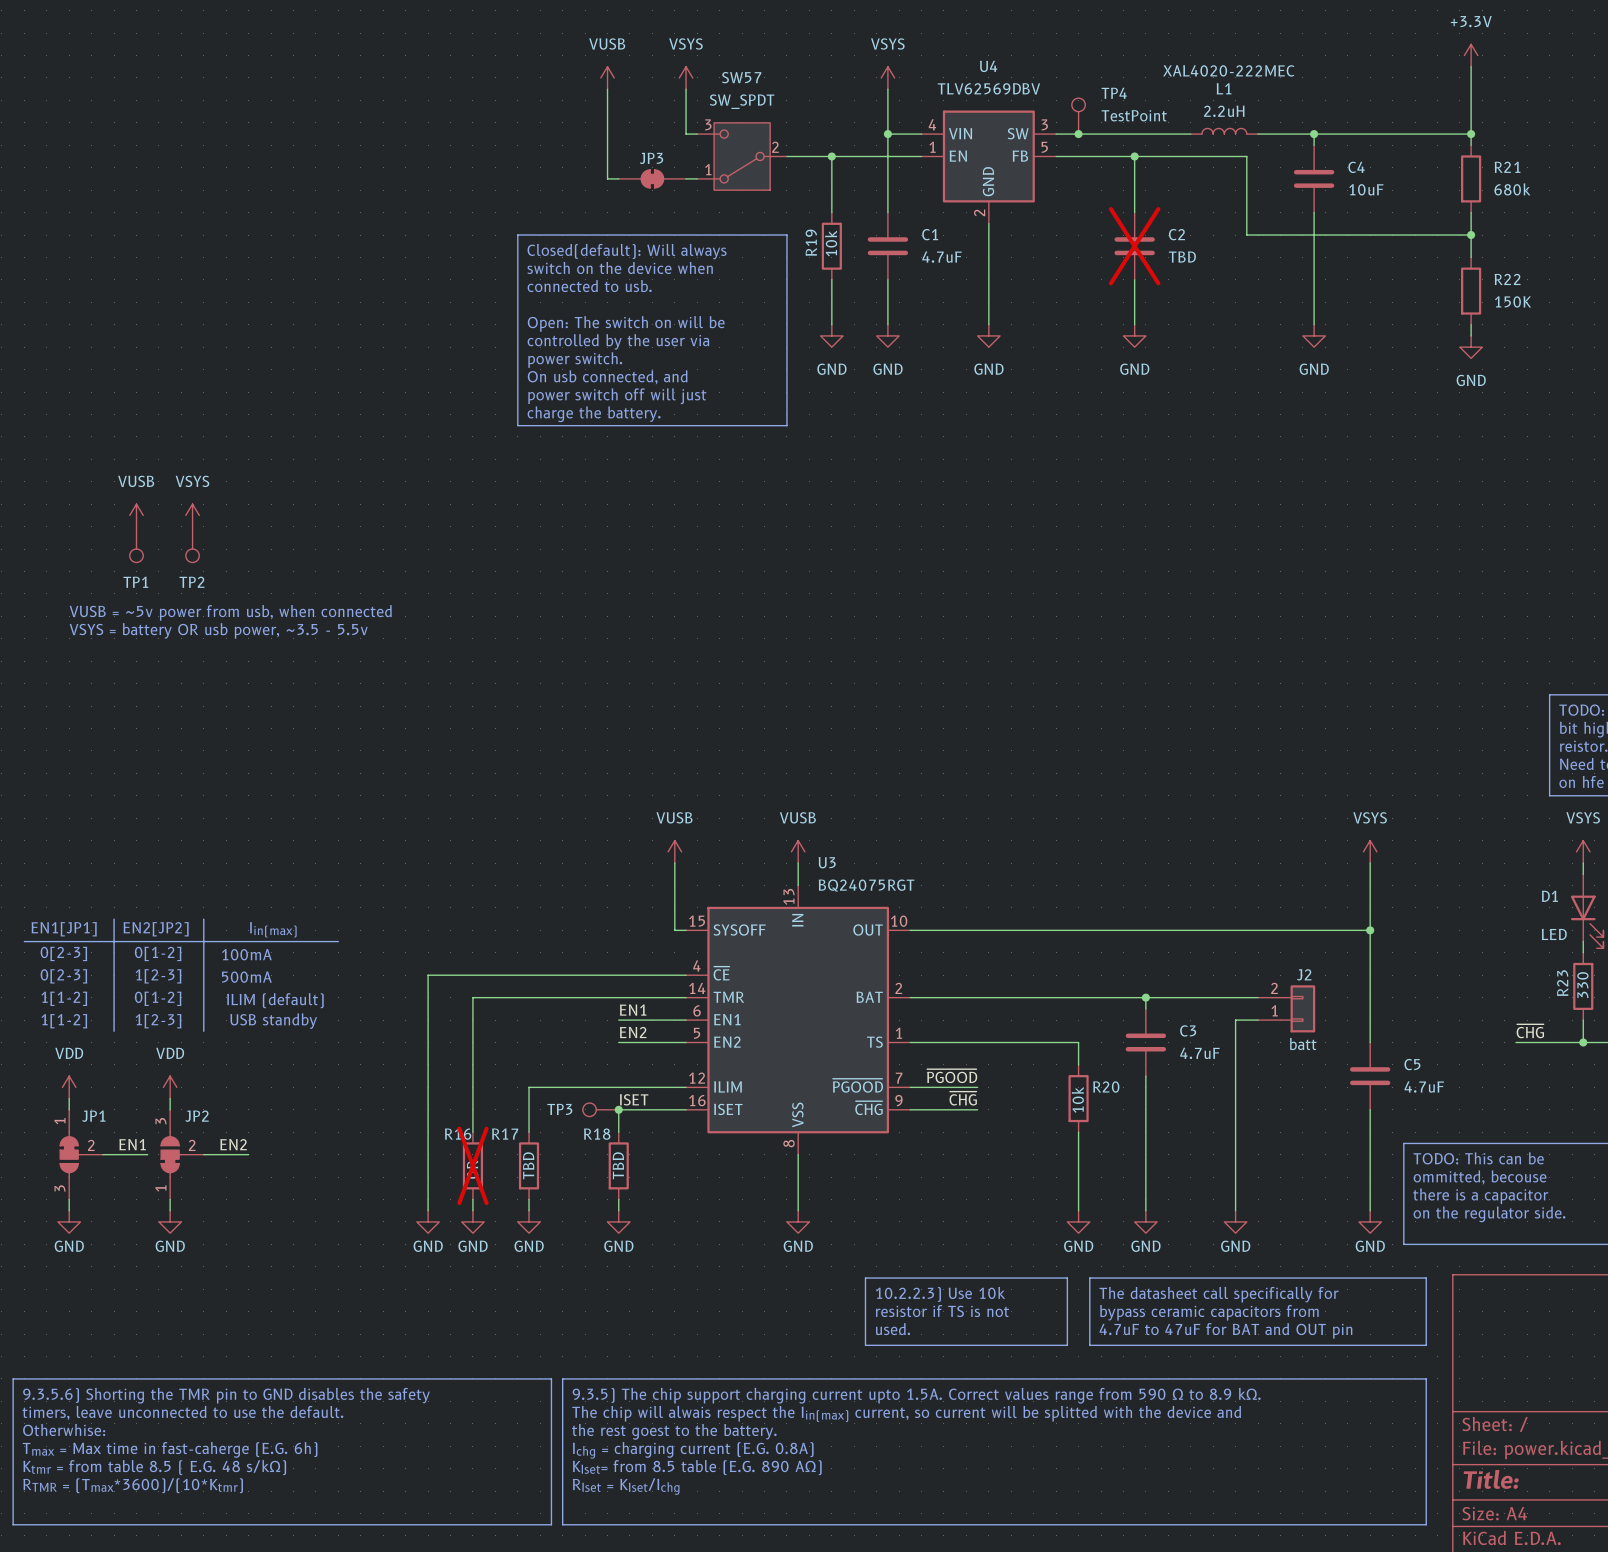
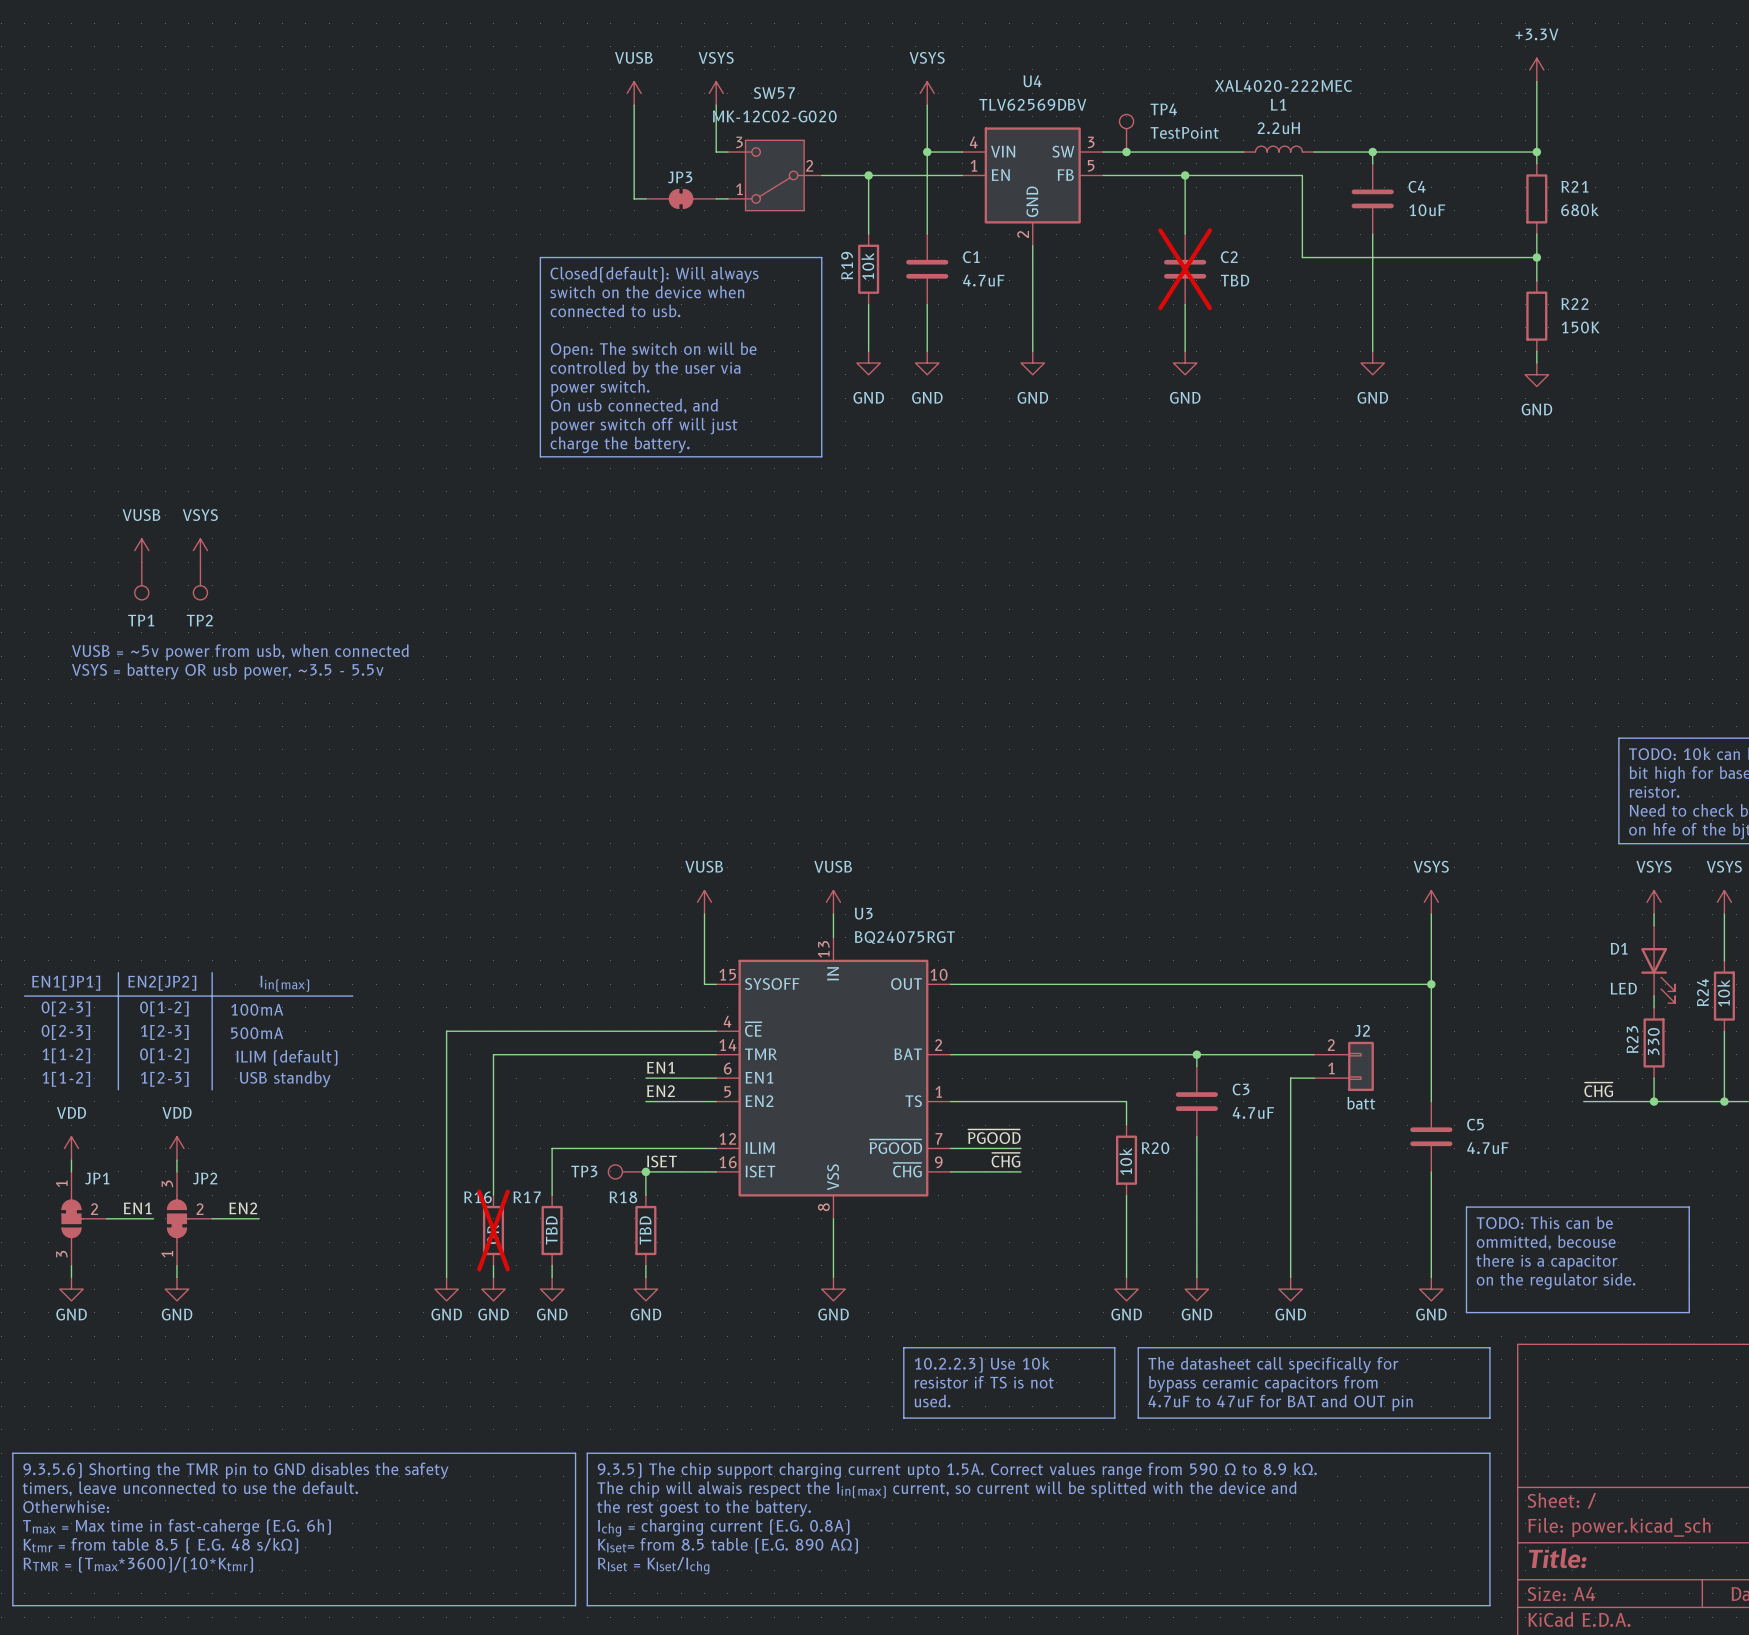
SW57 value: SW_SPDT (742, 101) -> MK-12C02-G020 (774, 116)

